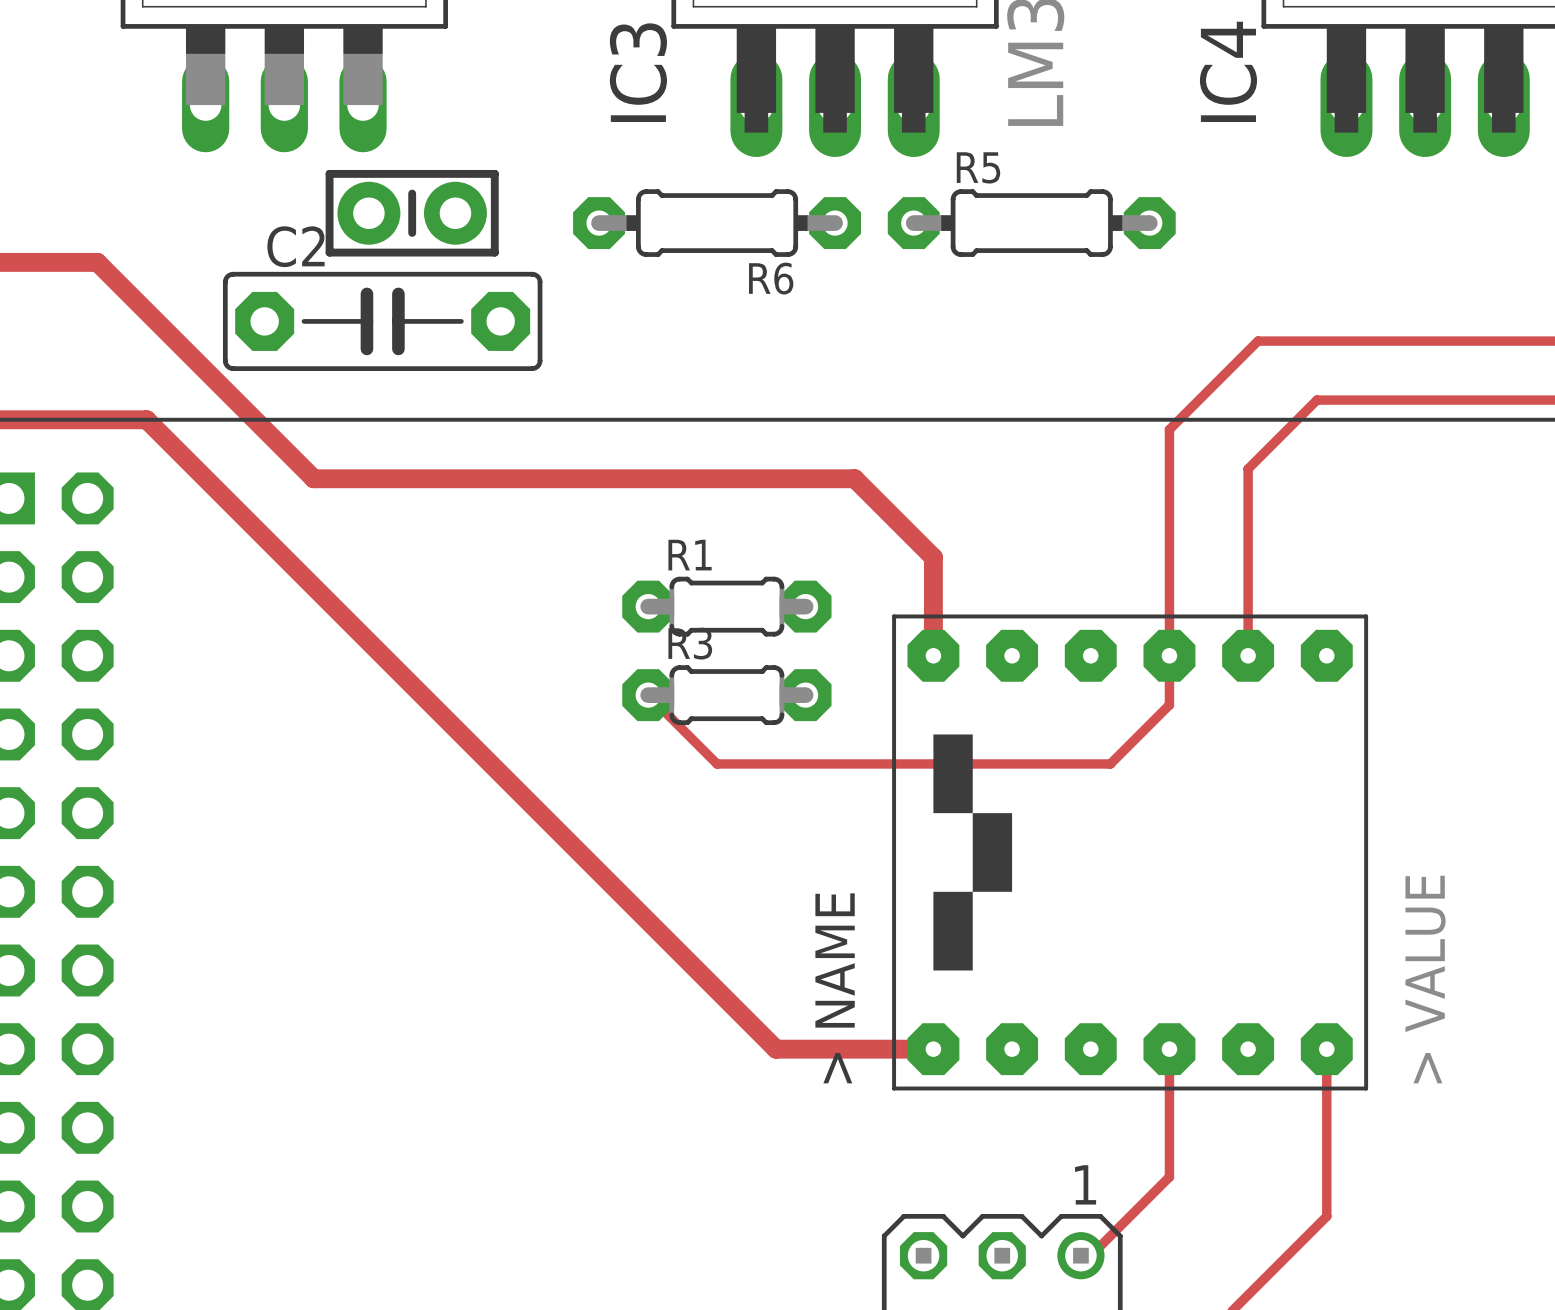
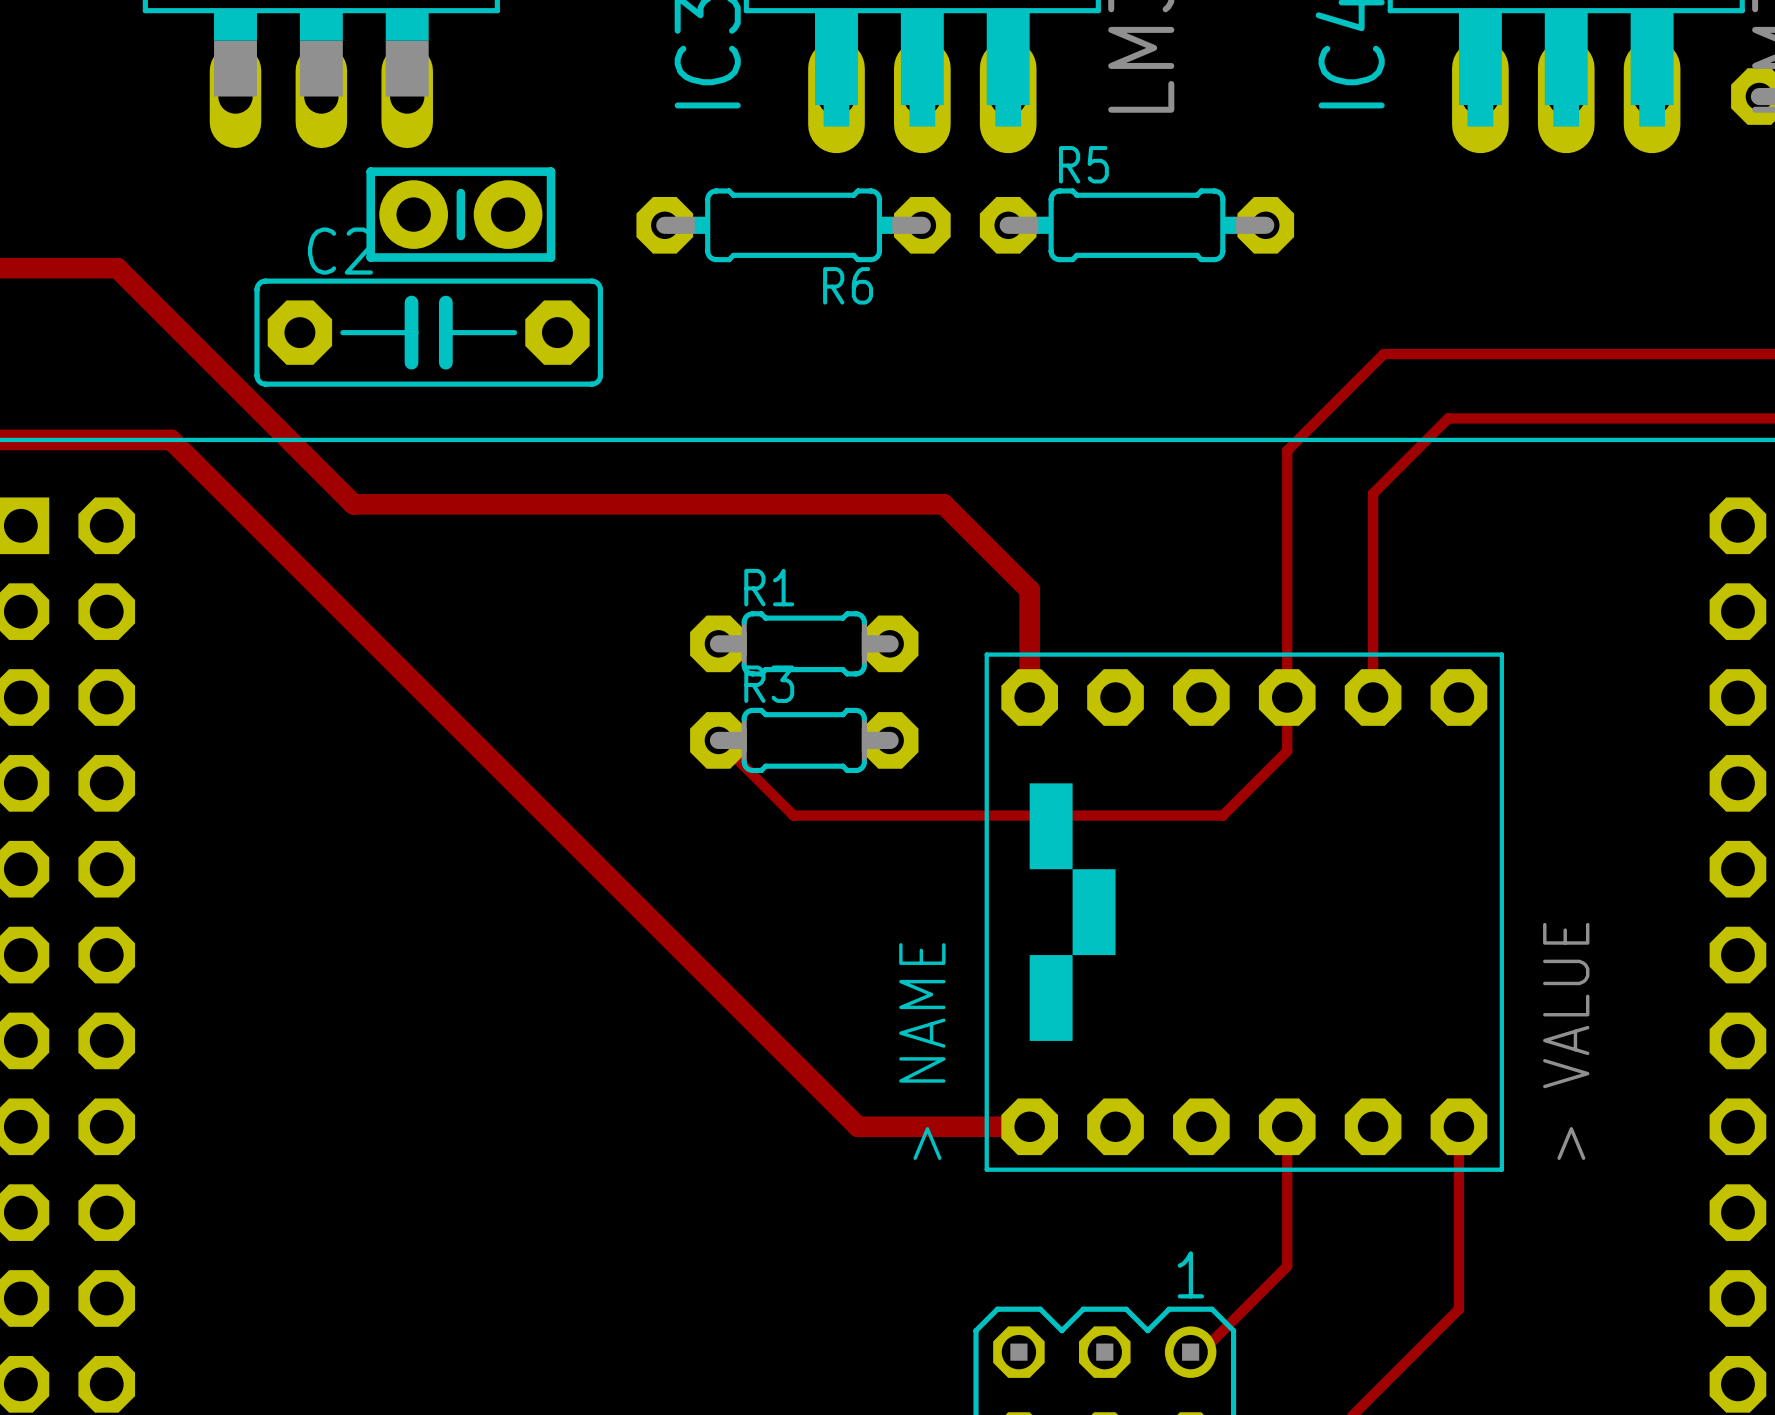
part footprint: [892, 614, 1369, 1091] -> [984, 652, 1505, 1172]

